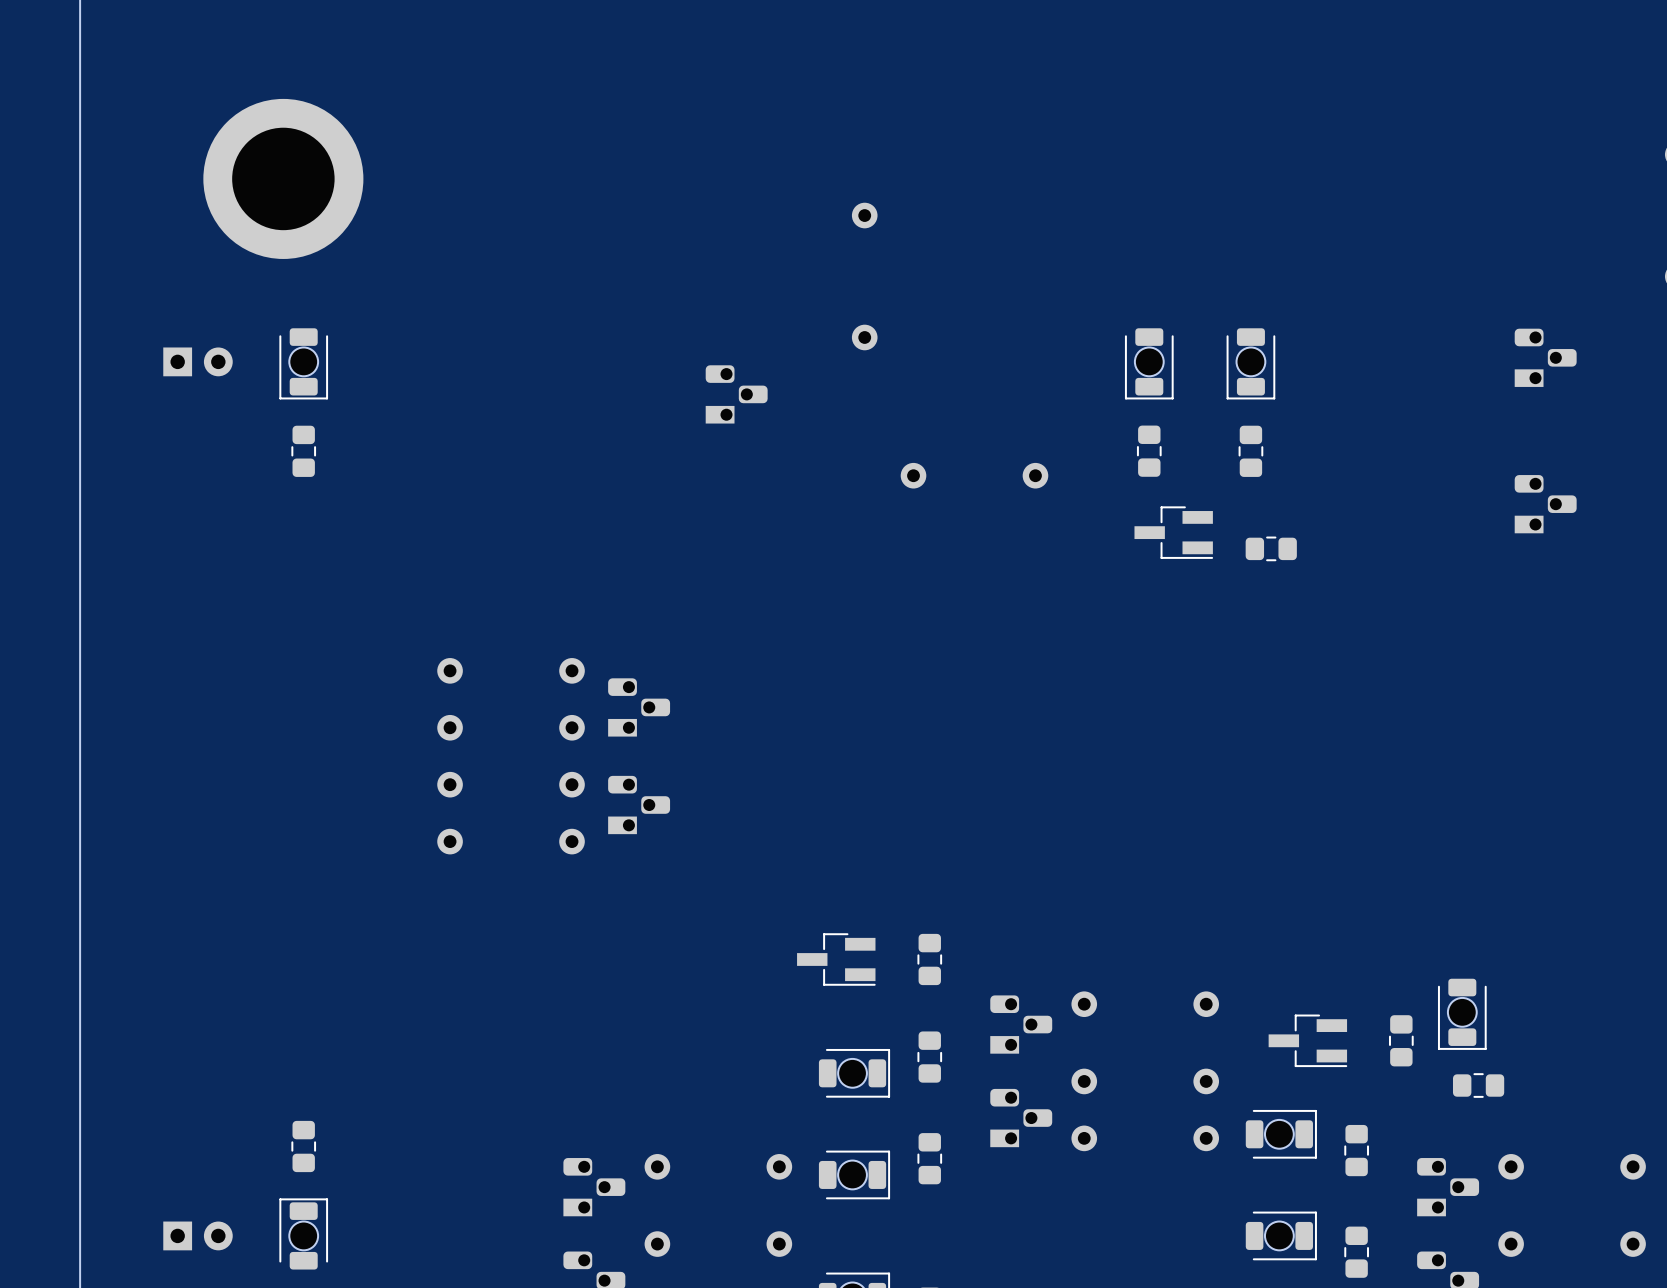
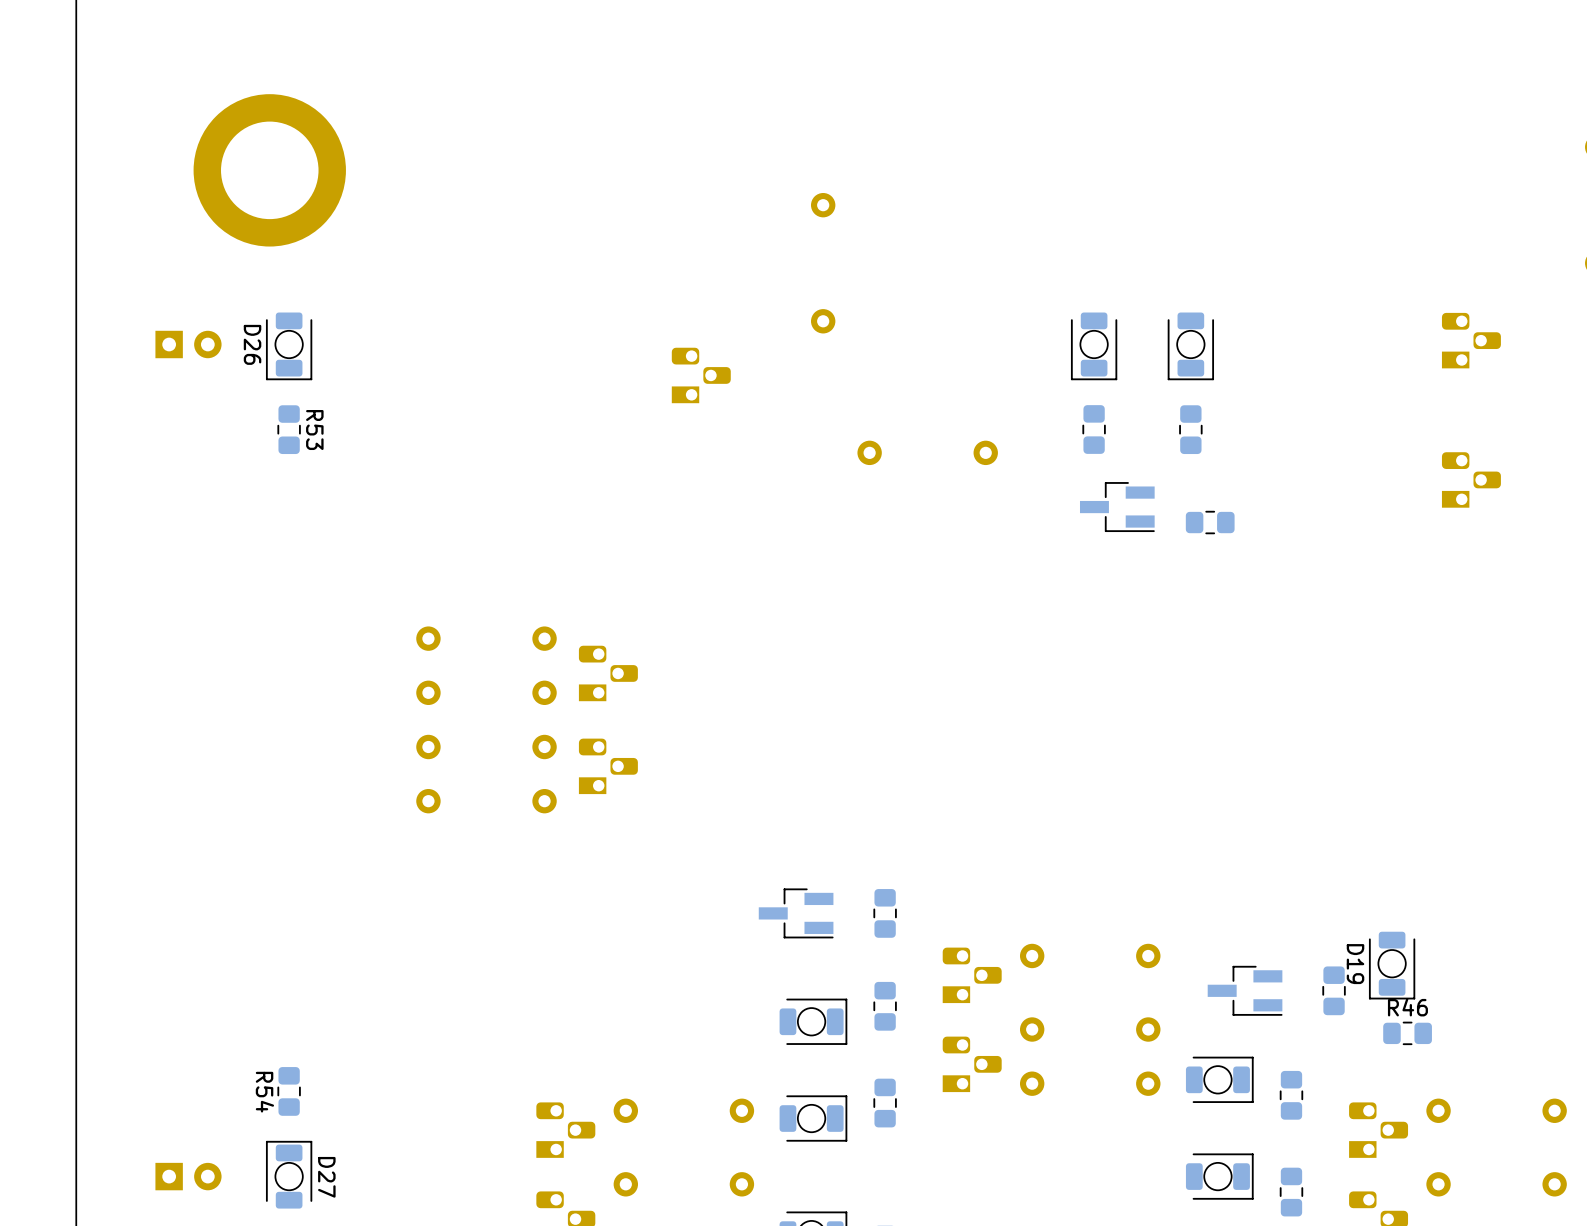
D26 name: none -> D26 (252, 344)
R53 name: none -> R53 (314, 430)
D19 name: none -> D19 (1355, 964)
R46 name: none -> R46 (1407, 1007)
R54 name: none -> R54 (264, 1092)
D27 name: none -> D27 (326, 1177)

